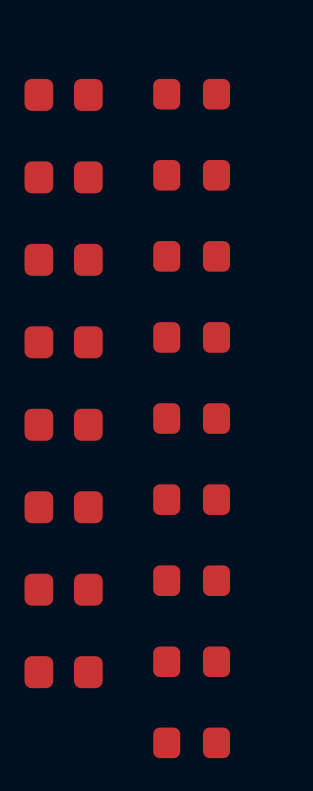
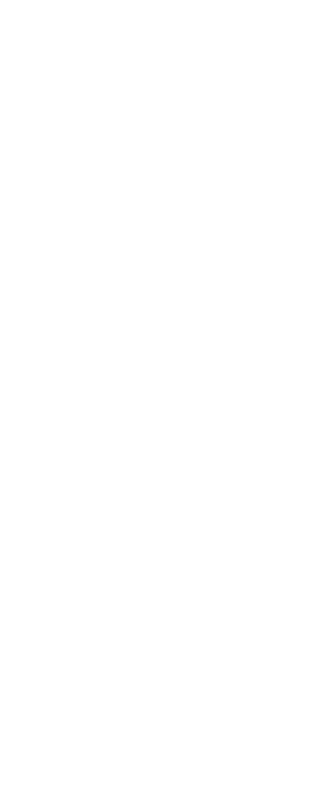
part: (63, 94) -> none
part: (191, 94) -> none
part: (191, 175) -> none
part: (63, 177) -> none
part: (191, 256) -> none
part: (63, 259) -> none
part: (191, 337) -> none
part: (63, 342) -> none
part: (191, 418) -> none
part: (63, 424) -> none
part: (191, 499) -> none
part: (63, 507) -> none
part: (191, 580) -> none
part: (63, 589) -> none
part: (191, 661) -> none
part: (63, 672) -> none
part: (191, 742) -> none

